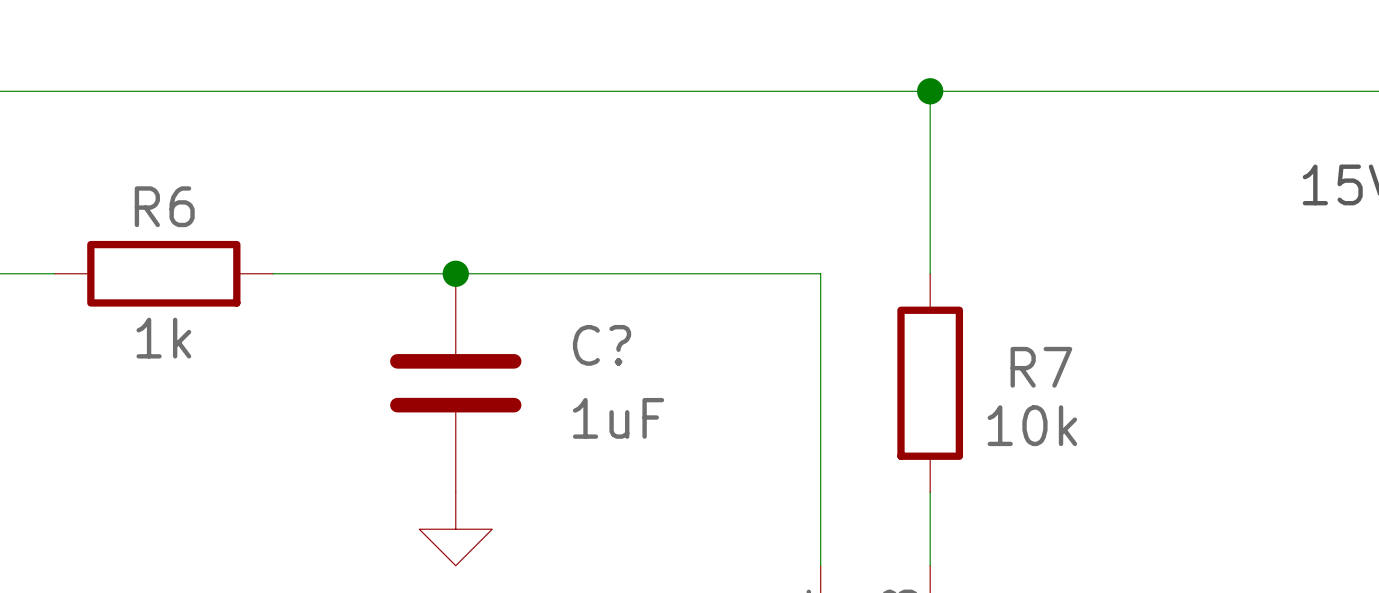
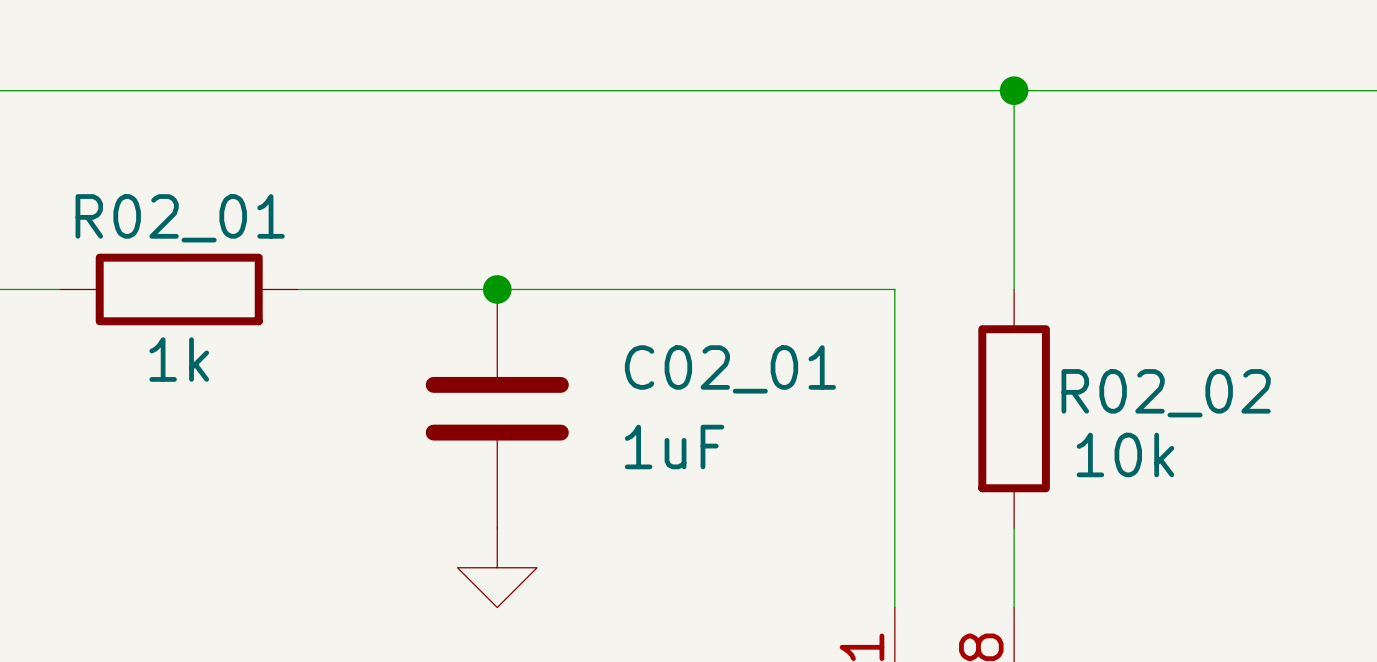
R6 name: R6 (164, 206) -> R02_01 (180, 218)
C? name: C? (602, 345) -> C02_01 (730, 369)
R7 name: R7 (1041, 367) -> R02_02 (1166, 393)

